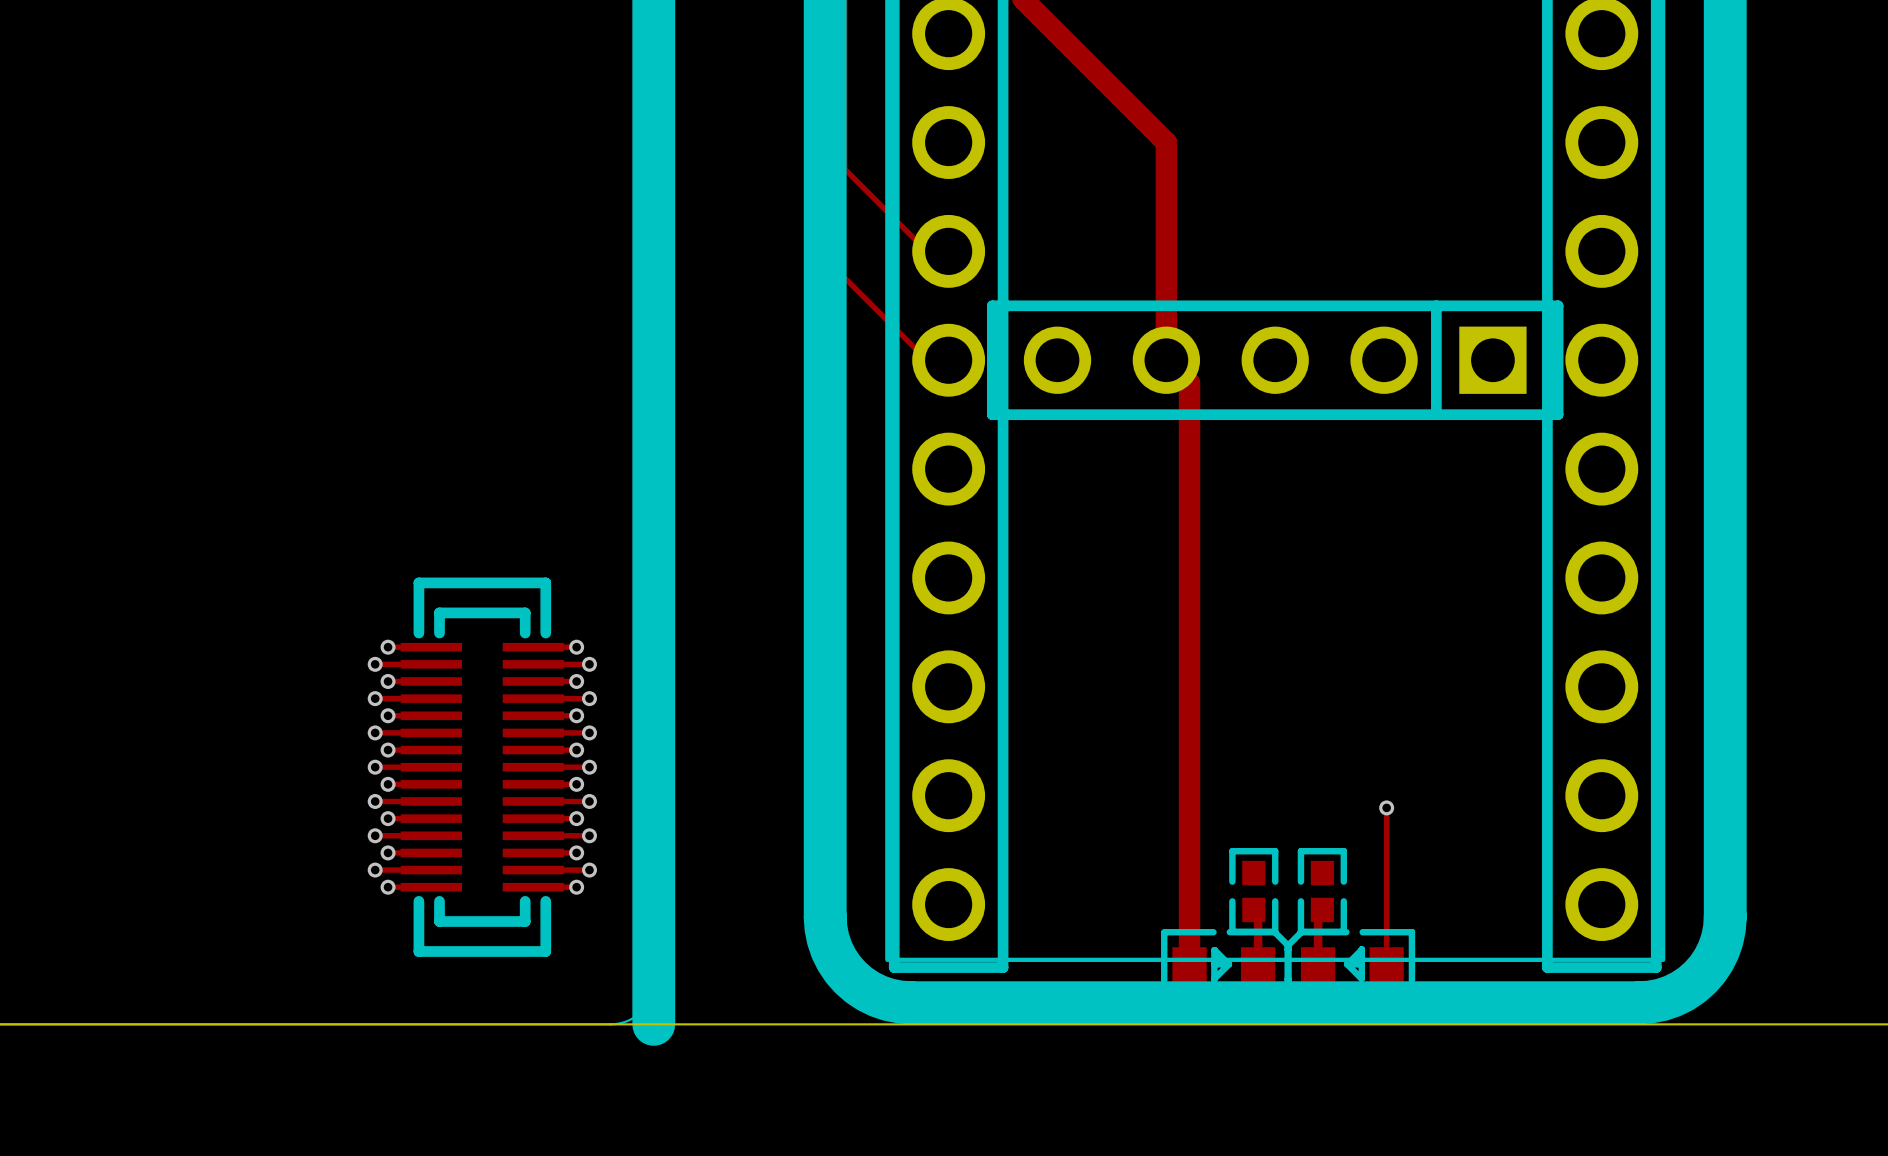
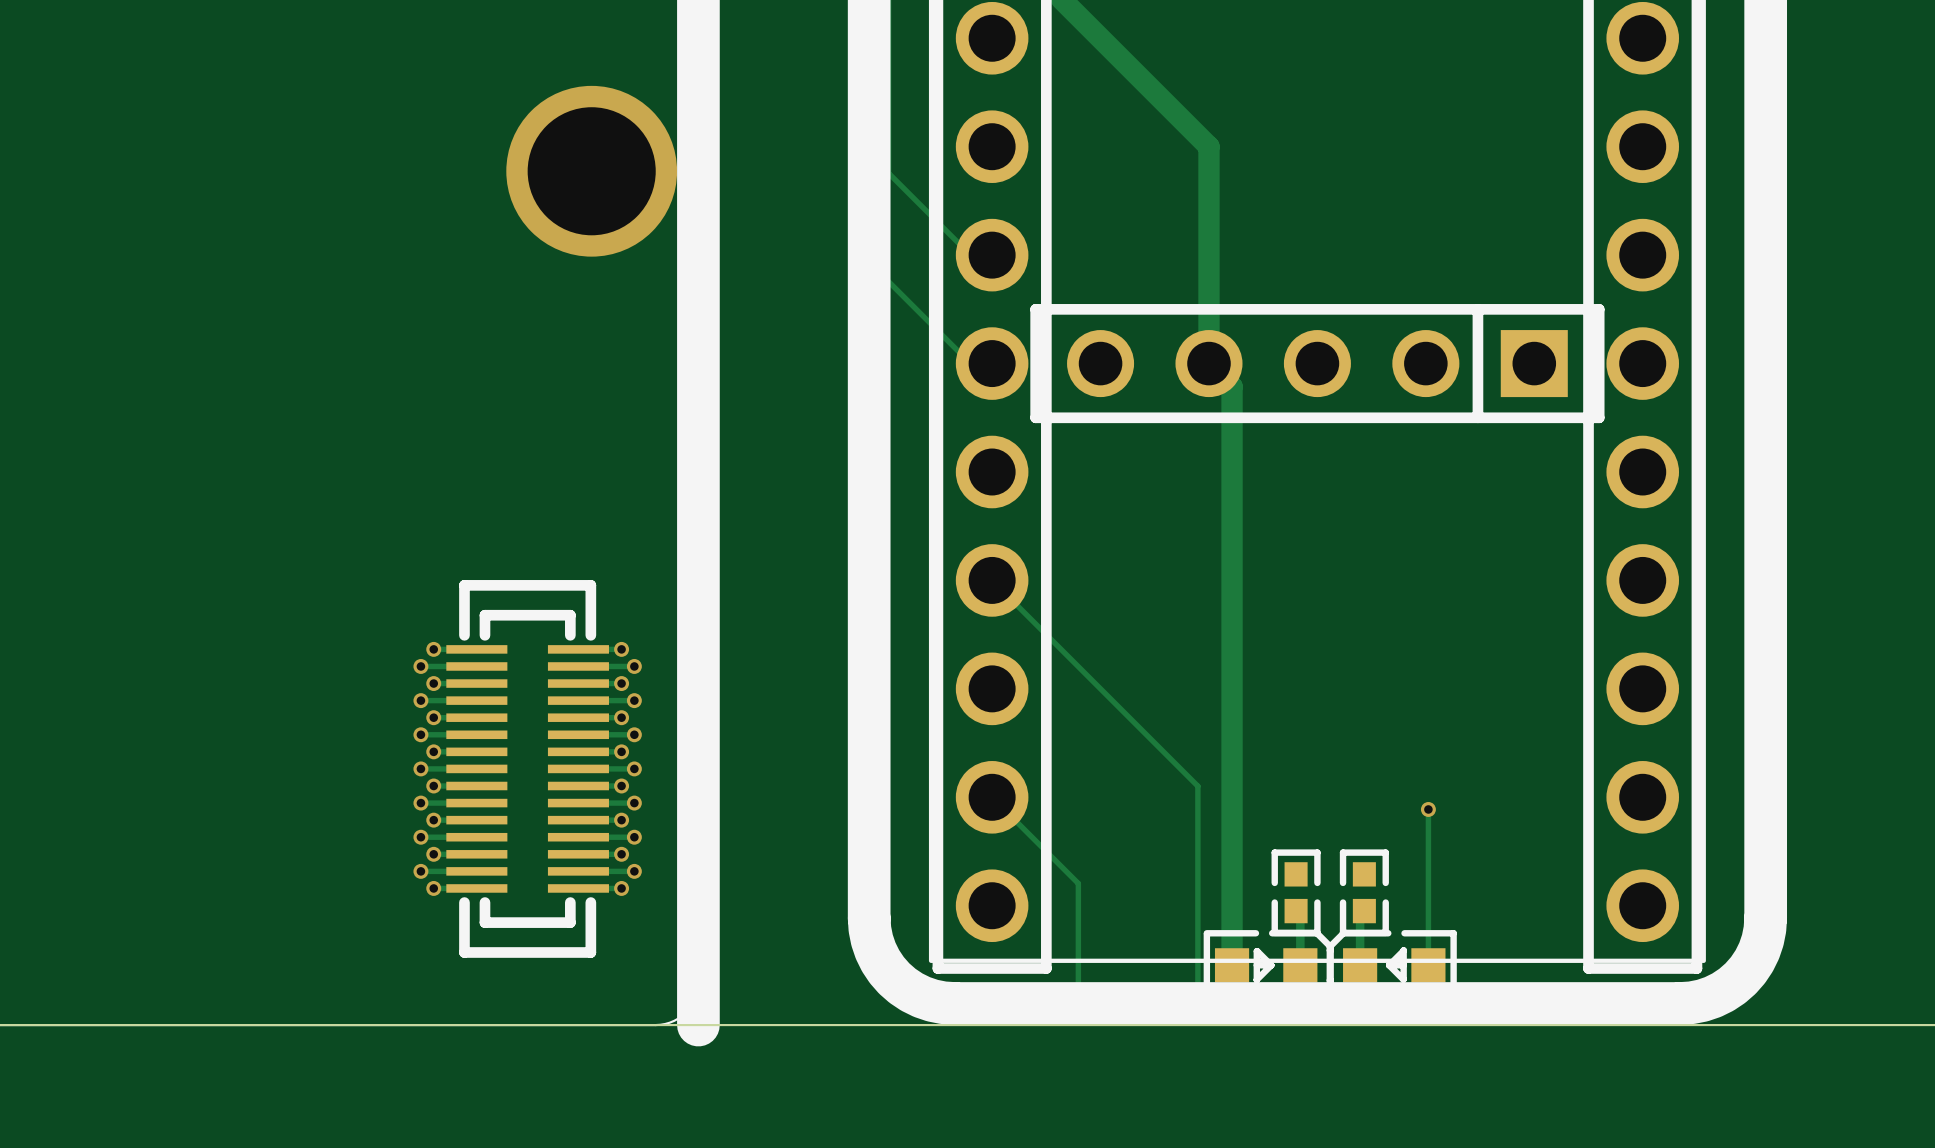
via: none -> (591, 171)
track: none -> (992, 580) (1197, 786) (1197, 995)
track: none -> (992, 797) (1078, 883) (1078, 999)

